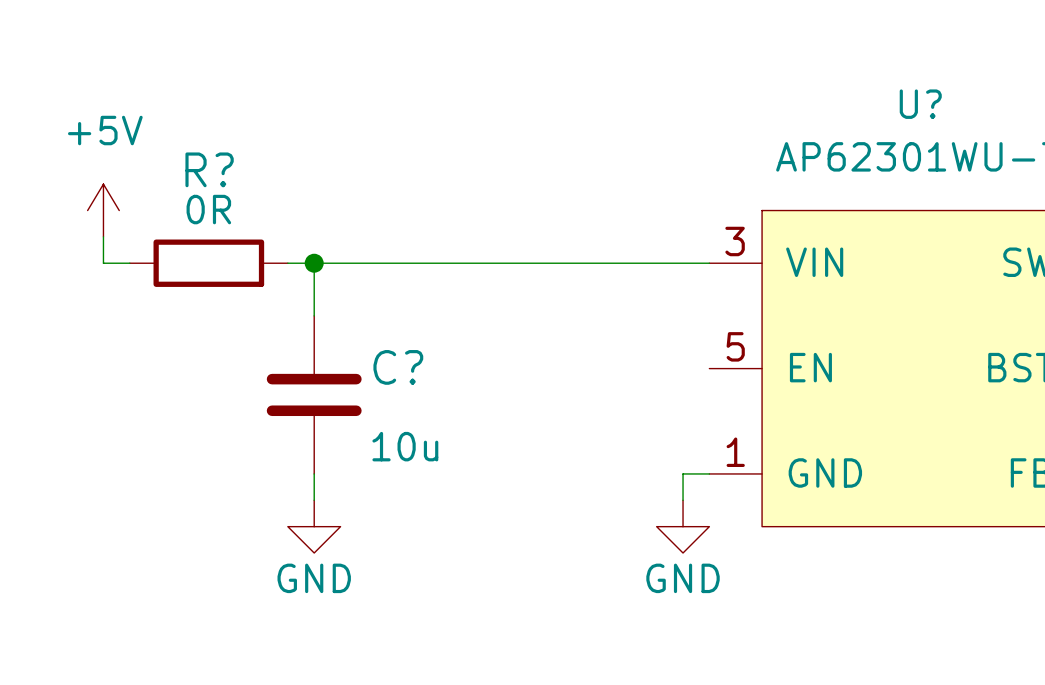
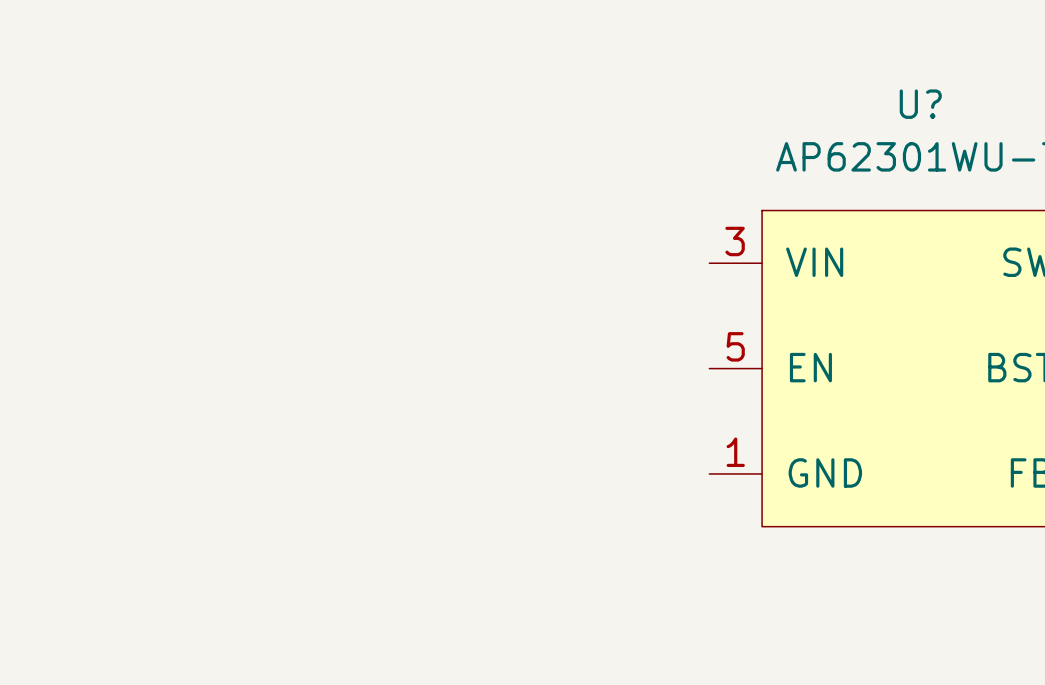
power symbol: +5V (103, 210) -> none
wire: (103, 236) (103, 263) (129, 263) -> none
R?: (208, 263) -> none
wire: (287, 263) (709, 263) -> none
wire: (314, 263) (314, 315) -> none
junction: (314, 263) -> none
C?: (314, 394) -> none
wire: (314, 473) (314, 500) -> none
wire: (709, 473) (683, 473) (683, 500) -> none
power symbol: GND (314, 526) -> none
power symbol: GND (683, 526) -> none

